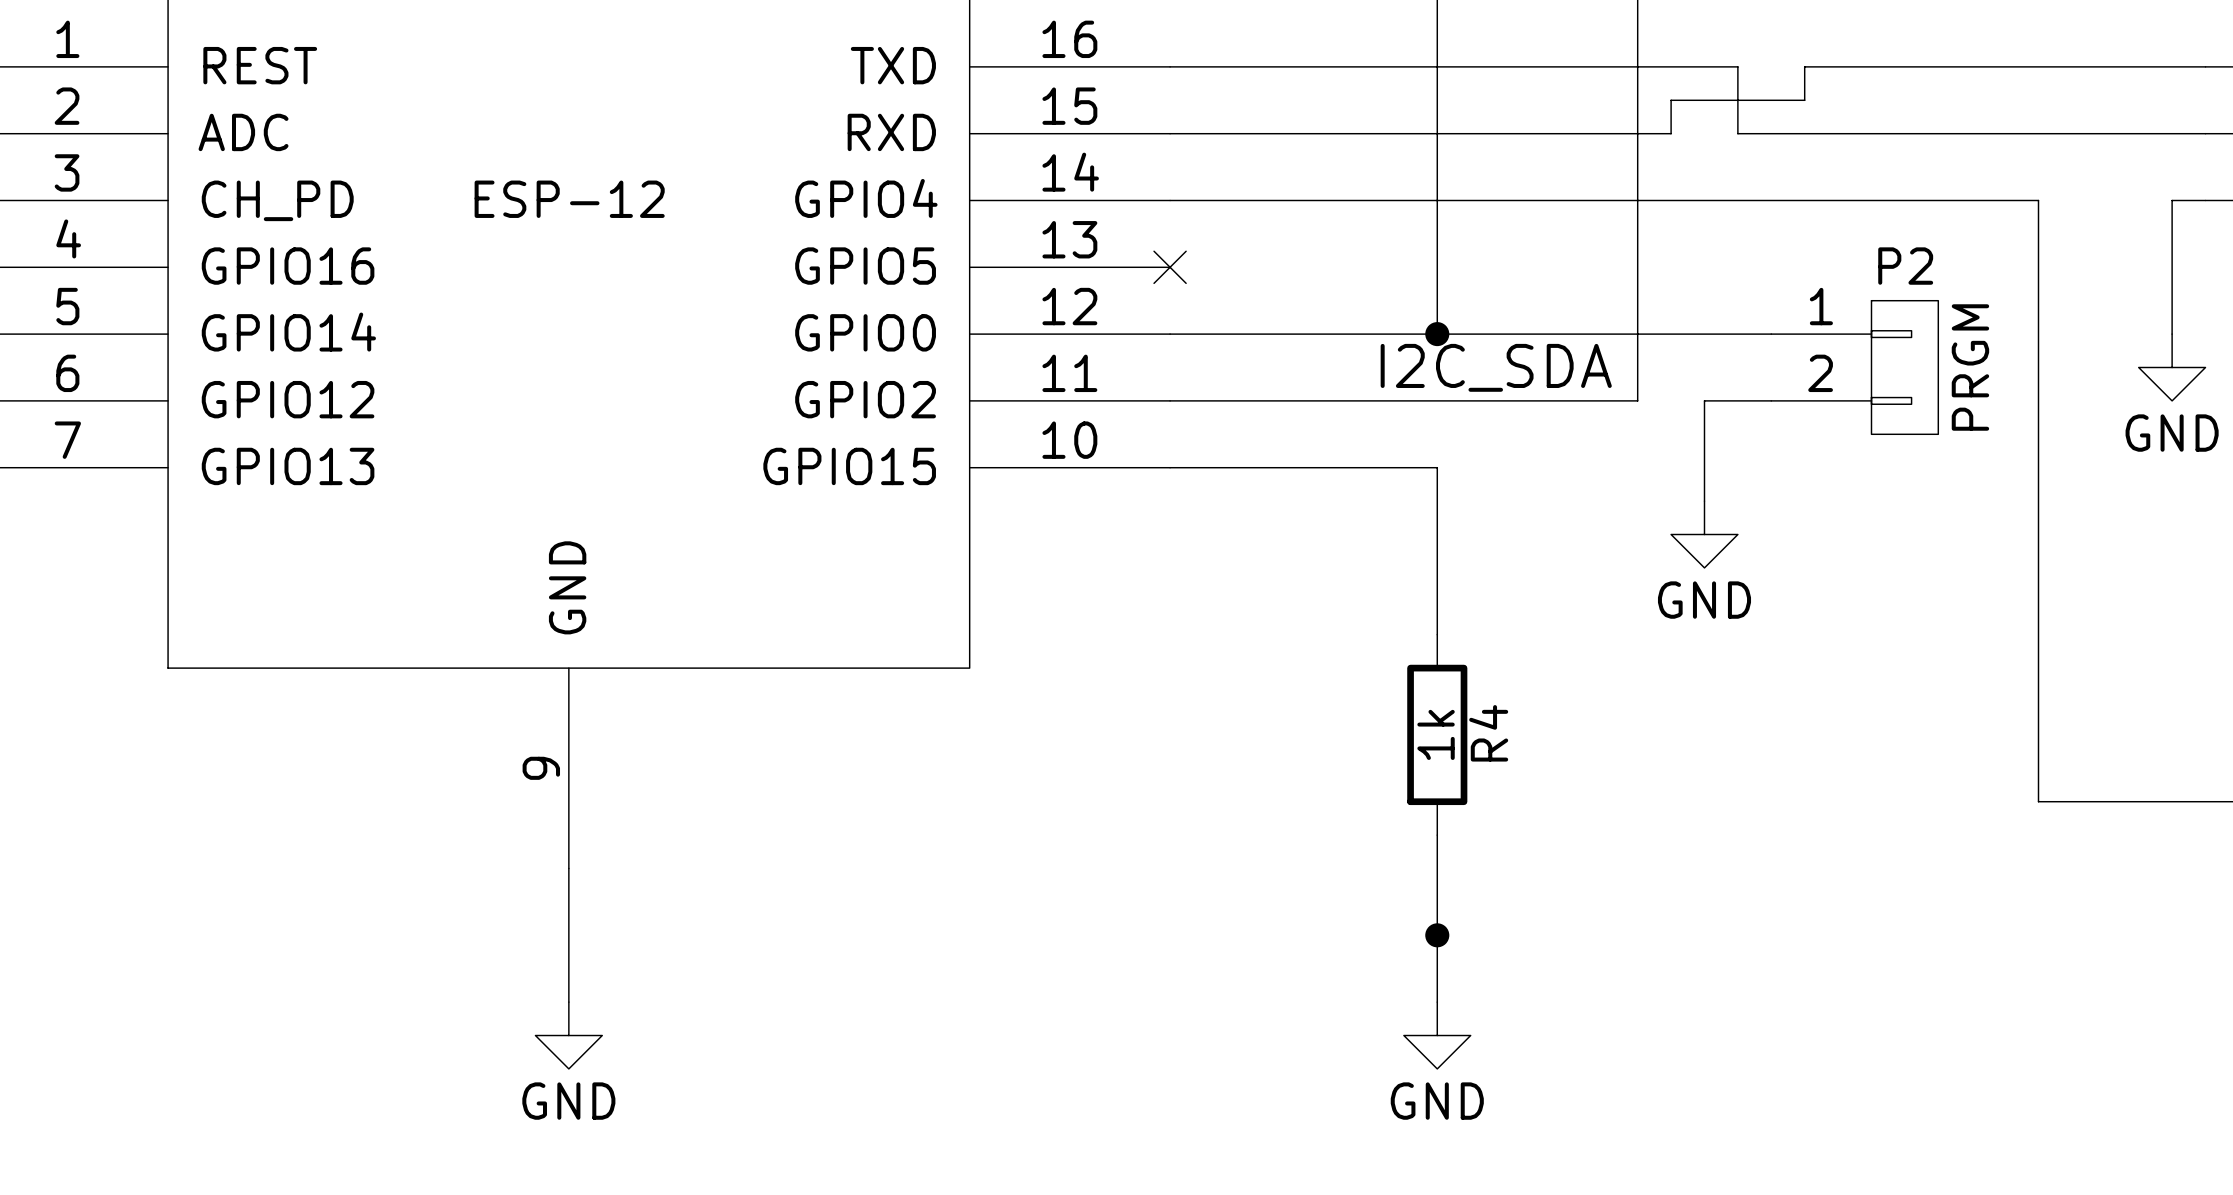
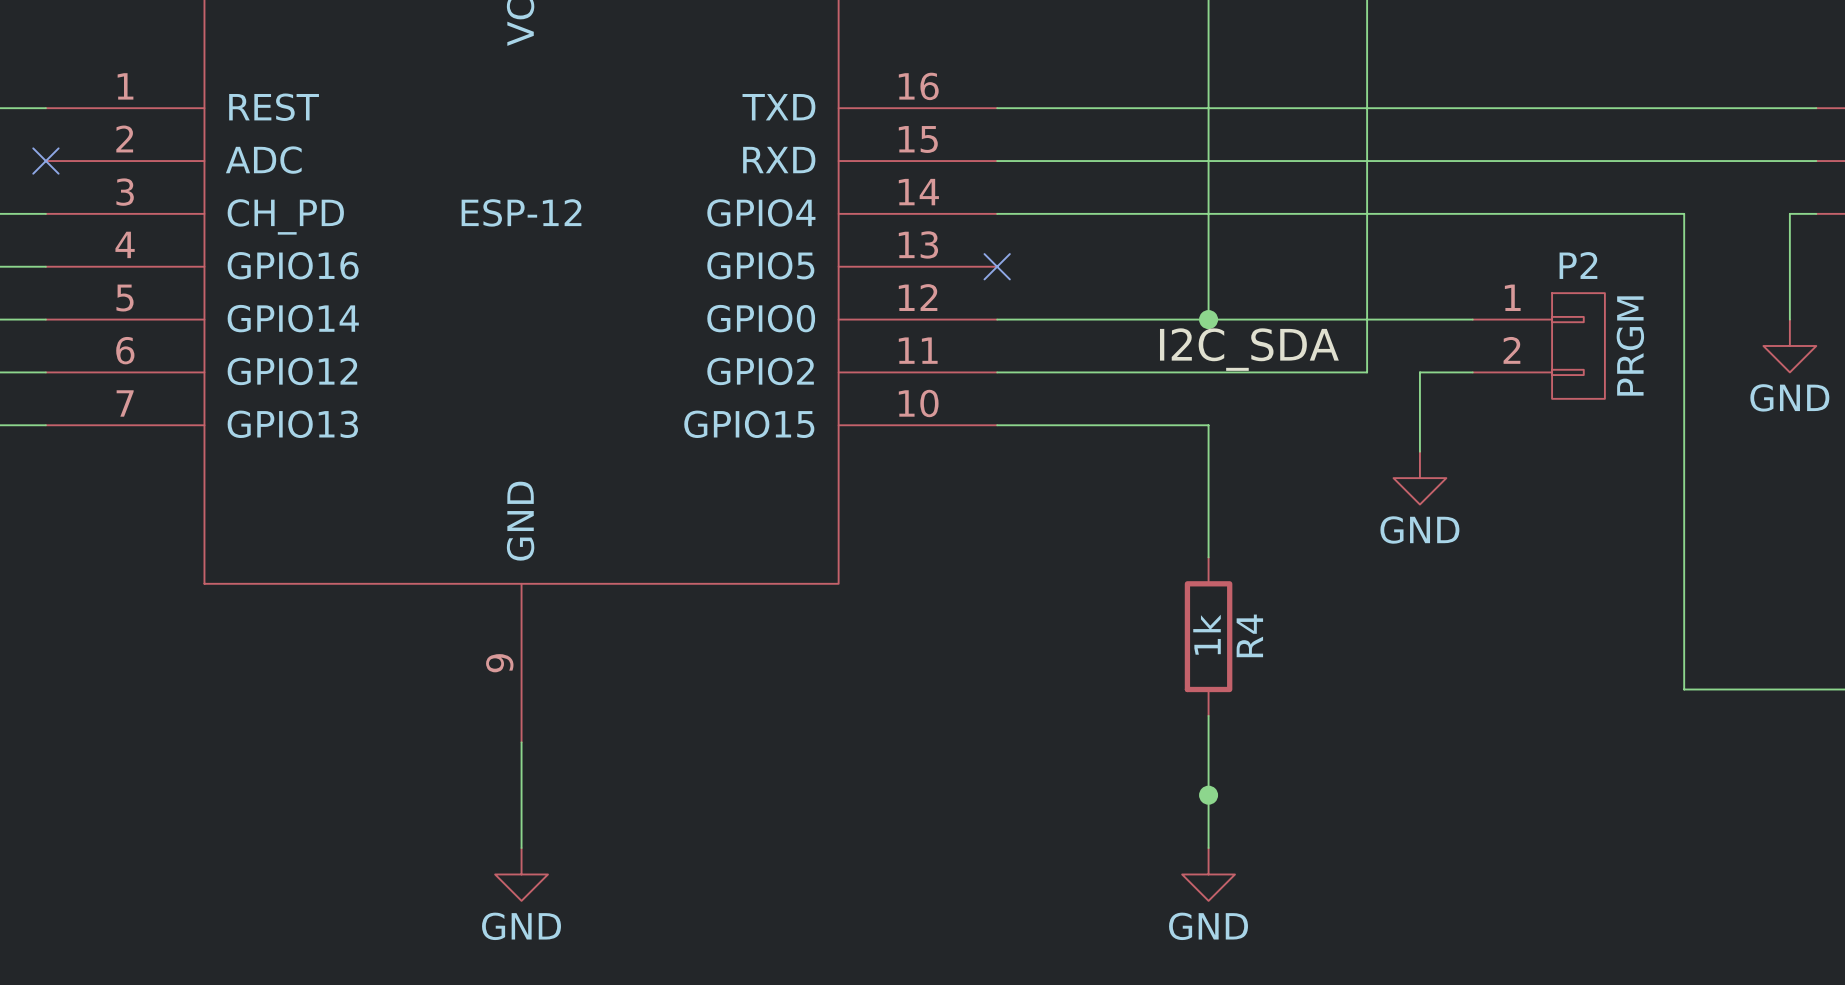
wire: (1737, 66) (1737, 133) -> (1446, 108) (1499, 108)
wire: (1804, 66) (1804, 100) (1671, 100) (1671, 133) -> (1446, 161) (1393, 161)

